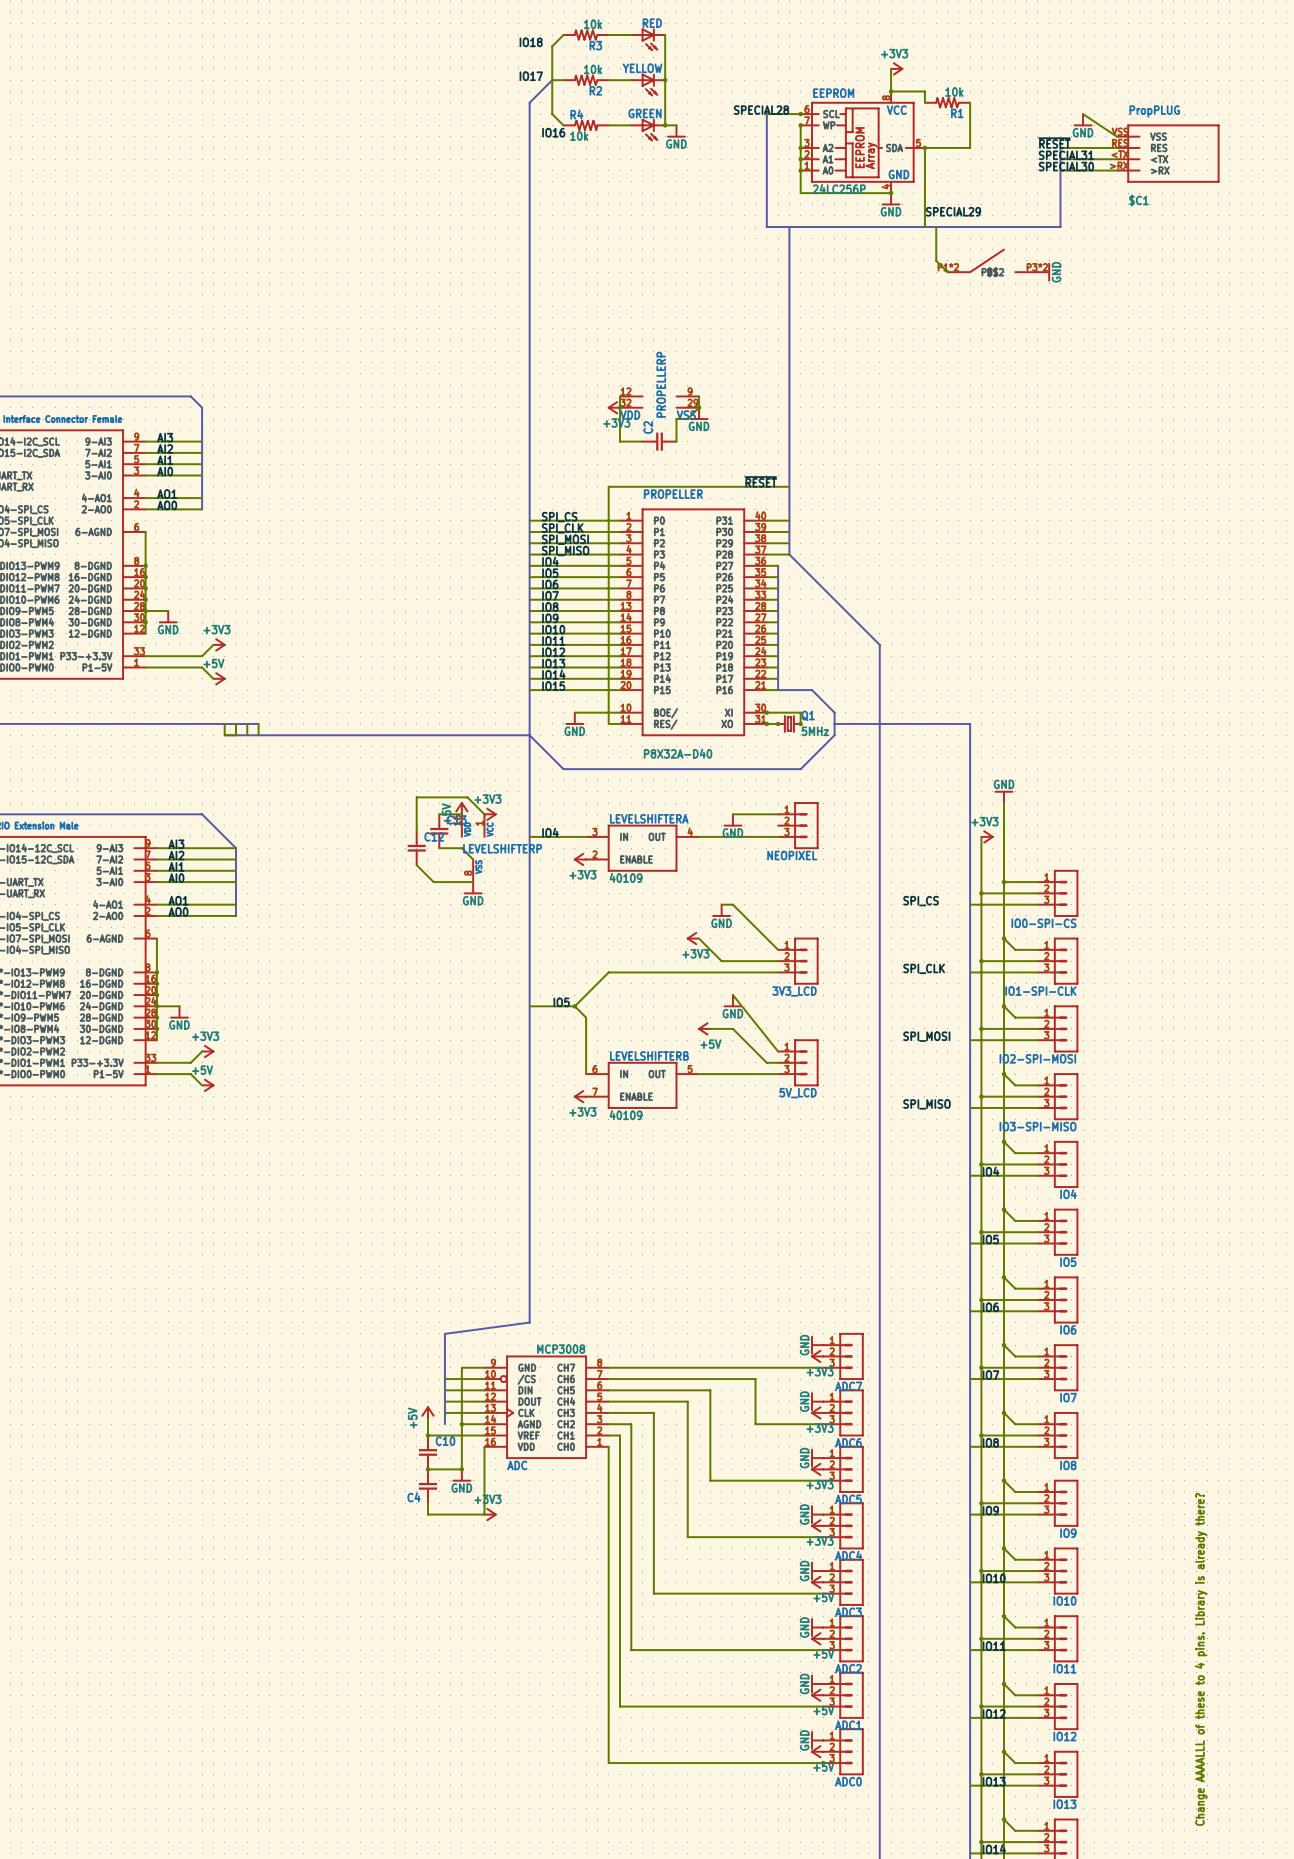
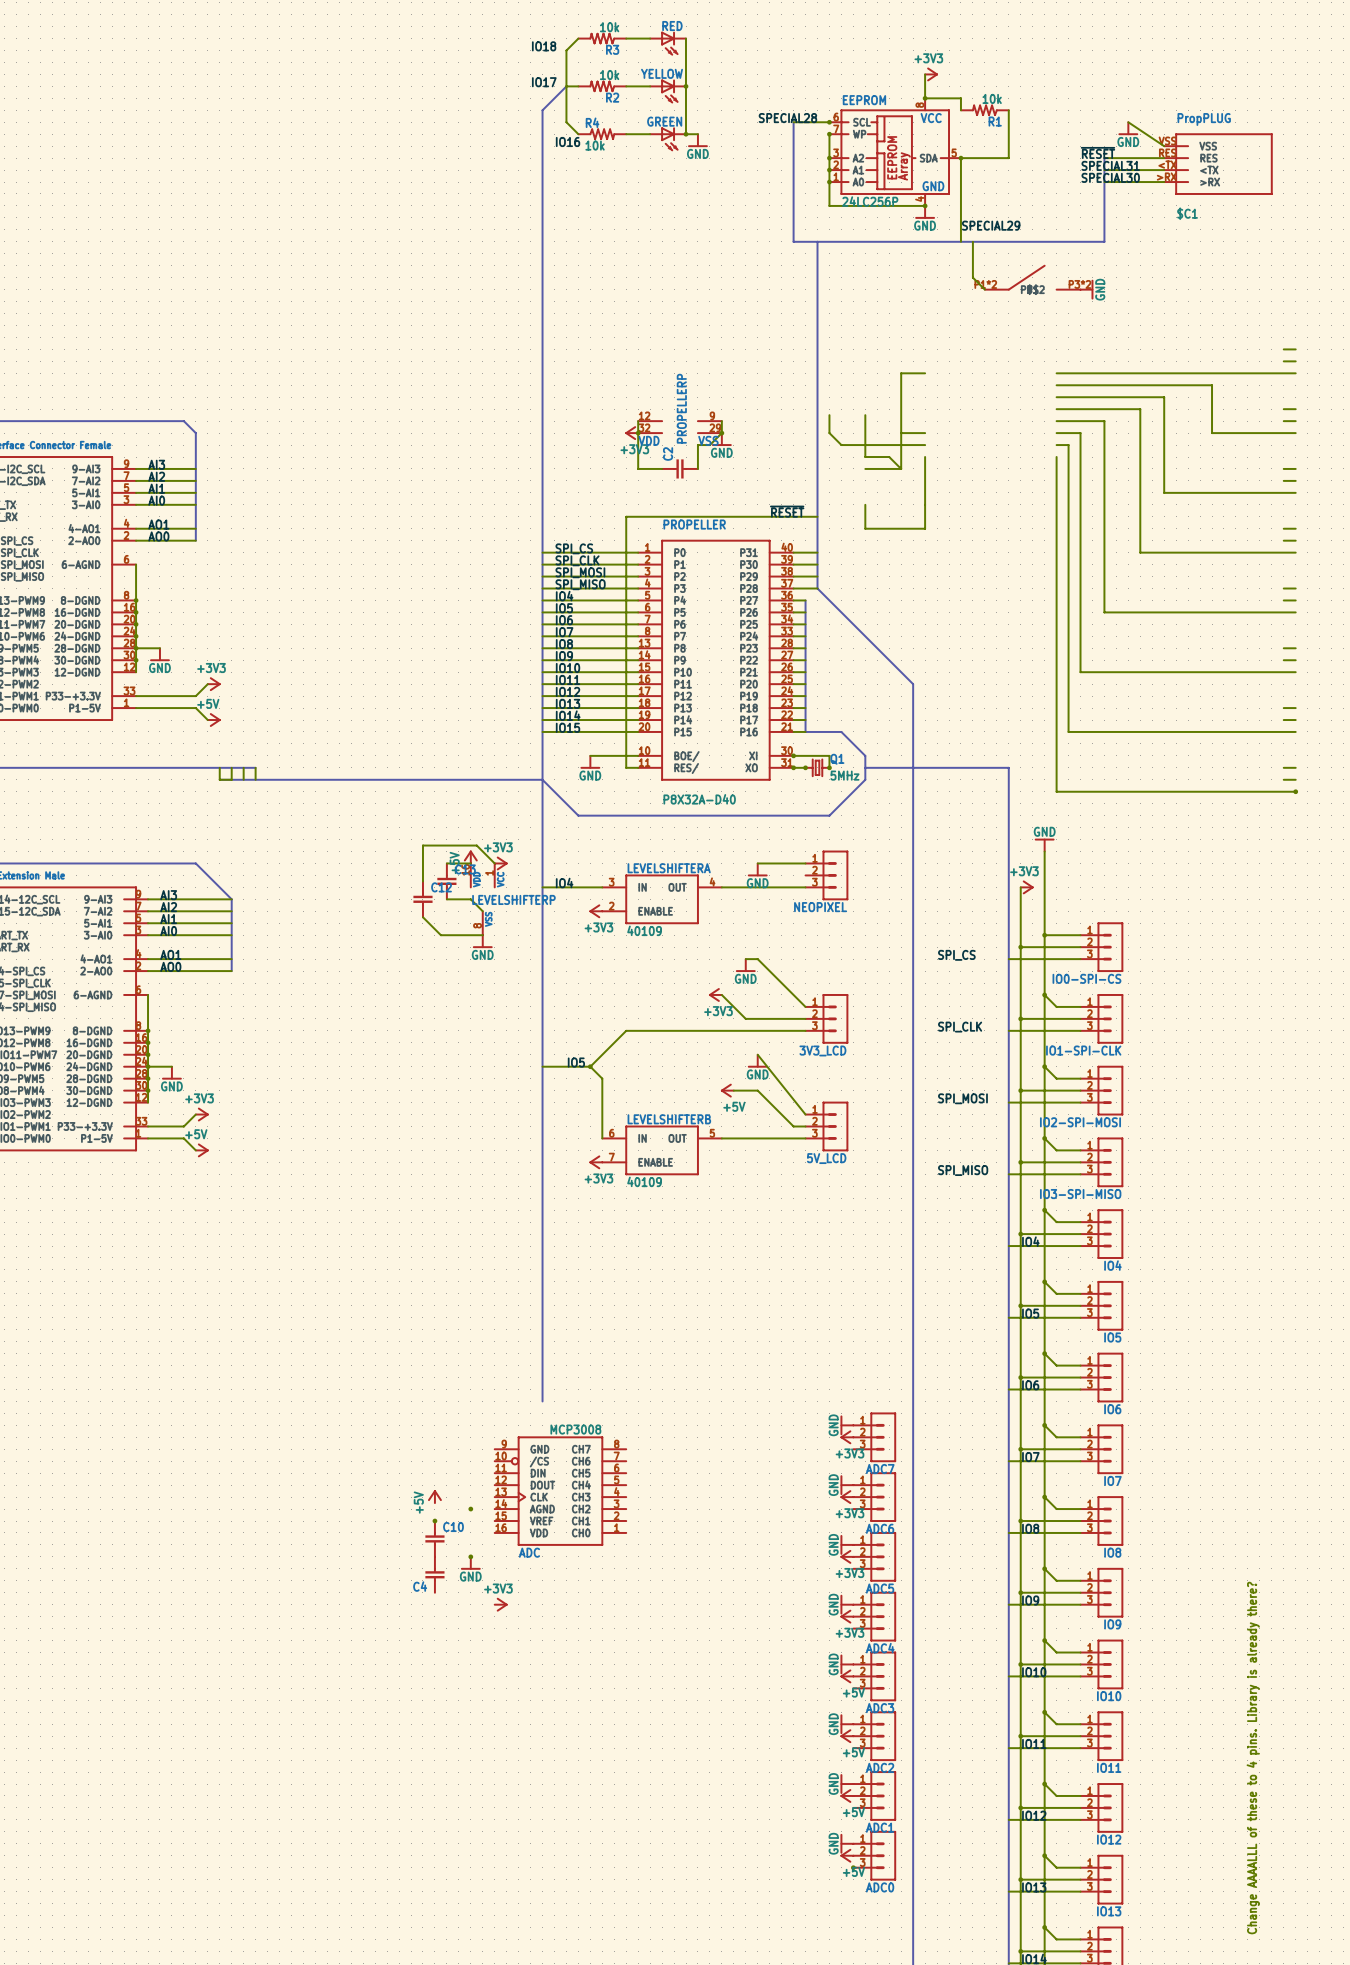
wire: none -> (1283, 349) (1295, 349)
wire: none -> (1283, 361) (1295, 361)
wire: none -> (925, 373) (901, 373) (901, 468)
wire: none -> (1056, 373) (1295, 373)
wire: none -> (1056, 385) (1212, 385) (1212, 433) (1295, 433)
wire: none -> (1056, 397) (1164, 397) (1164, 492) (1295, 492)
wire: none -> (1056, 409) (1140, 409) (1140, 552) (1295, 552)
wire: none -> (1283, 409) (1295, 409)
wire: none -> (829, 415) (829, 433) (841, 445) (925, 445)
wire: none -> (865, 415) (865, 457) (889, 457) (901, 468)
wire: none -> (1056, 421) (1104, 421) (1104, 612) (1295, 612)
wire: none -> (1283, 421) (1295, 421)
wire: none -> (901, 433) (925, 433)
wire: none -> (1056, 433) (1080, 433) (1080, 672) (1295, 672)
wire: none -> (1056, 445) (1068, 445) (1068, 731) (1295, 731)
wire: none -> (925, 457) (925, 528) (865, 528) (865, 504)
wire: none -> (1056, 457) (1056, 791) (1295, 791)
wire: none -> (865, 468) (901, 468)
wire: none -> (1283, 468) (1295, 468)
wire: none -> (1283, 480) (1295, 480)
wire: none -> (1283, 528) (1295, 528)
wire: none -> (1283, 540) (1295, 540)
wire: none -> (1283, 588) (1295, 588)
wire: none -> (1283, 600) (1295, 600)
wire: none -> (1283, 648) (1295, 648)
wire: none -> (1283, 660) (1295, 660)
wire: none -> (1283, 708) (1295, 708)
wire: none -> (1283, 720) (1295, 720)
wire: none -> (1283, 767) (1295, 767)
wire: none -> (1283, 779) (1295, 779)
junction: none -> (1295, 791)
bus: (529, 1322) (444, 1333) (444, 1424) -> none
wire: (484, 1367) (461, 1367) (461, 1469) (427, 1469) -> none
wire: (608, 1367) (823, 1367) -> none
wire: (444, 1379) (484, 1379) -> none
wire: (608, 1379) (755, 1379) (755, 1424) (823, 1424) -> none
wire: (444, 1390) (484, 1390) -> none
wire: (608, 1390) (710, 1390) (710, 1480) (823, 1480) -> none
wire: (444, 1401) (484, 1401) -> none
wire: (608, 1401) (687, 1401) (687, 1537) (823, 1537) -> none
wire: (444, 1412) (484, 1412) -> none
wire: (608, 1412) (653, 1412) (653, 1593) (823, 1593) -> none
wire: (427, 1418) (427, 1435) (484, 1435) -> none
wire: (461, 1424) (484, 1424) -> none
wire: (608, 1424) (631, 1424) (631, 1650) (823, 1650) -> none
wire: (608, 1435) (620, 1435) (620, 1706) (823, 1706) -> none
wire: (484, 1446) (484, 1514) (427, 1514) (427, 1503) -> none
wire: (608, 1446) (608, 1763) (823, 1763) -> none
junction: (427, 1469) -> none

